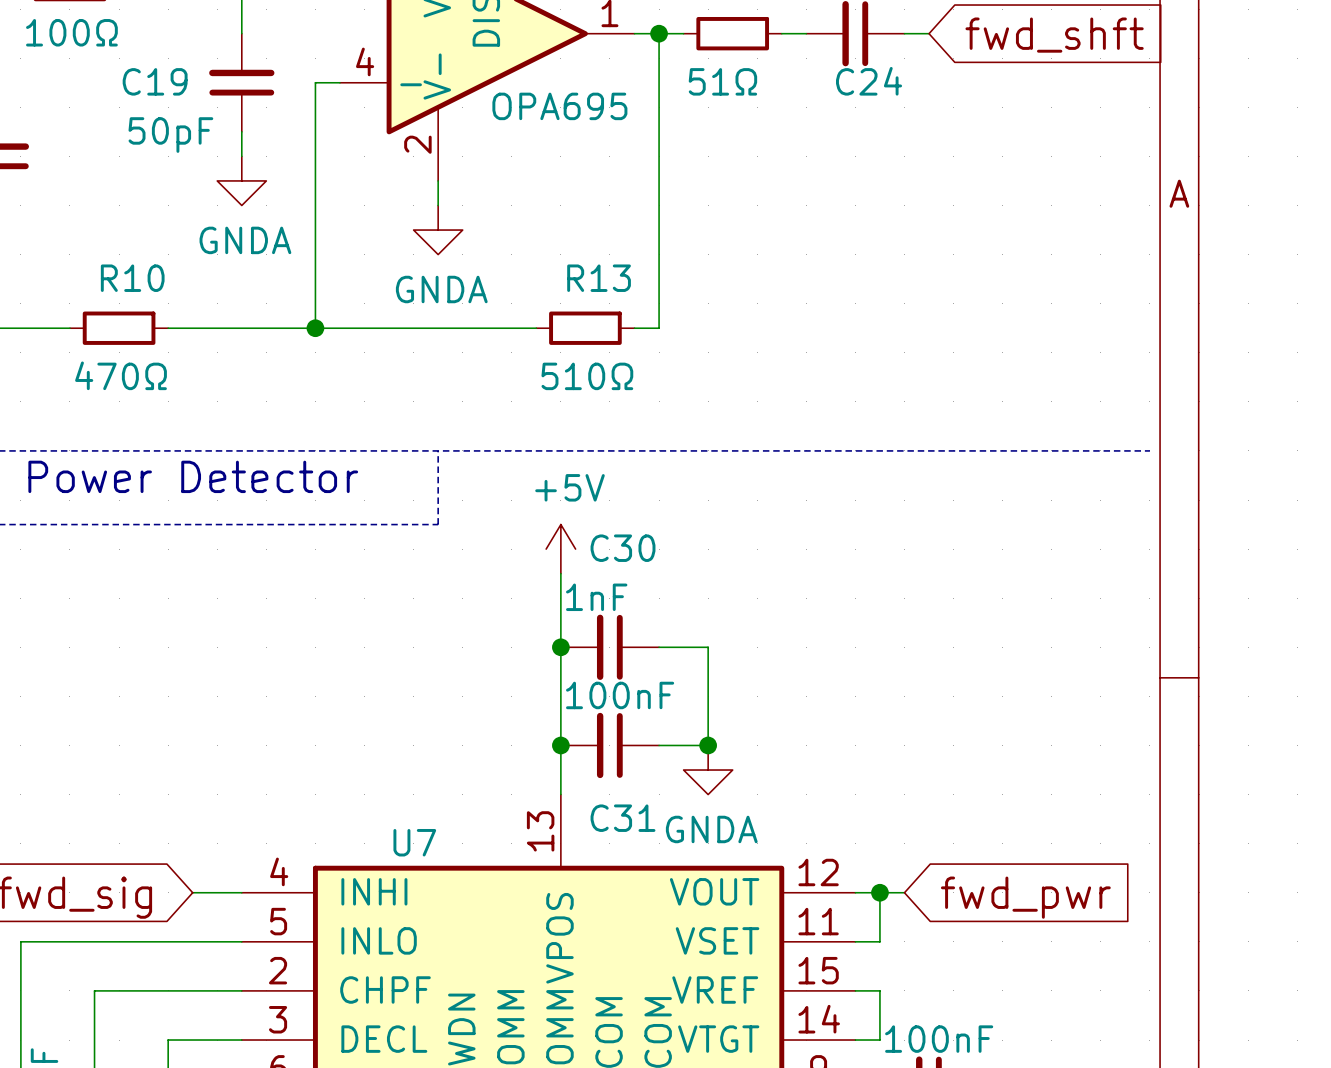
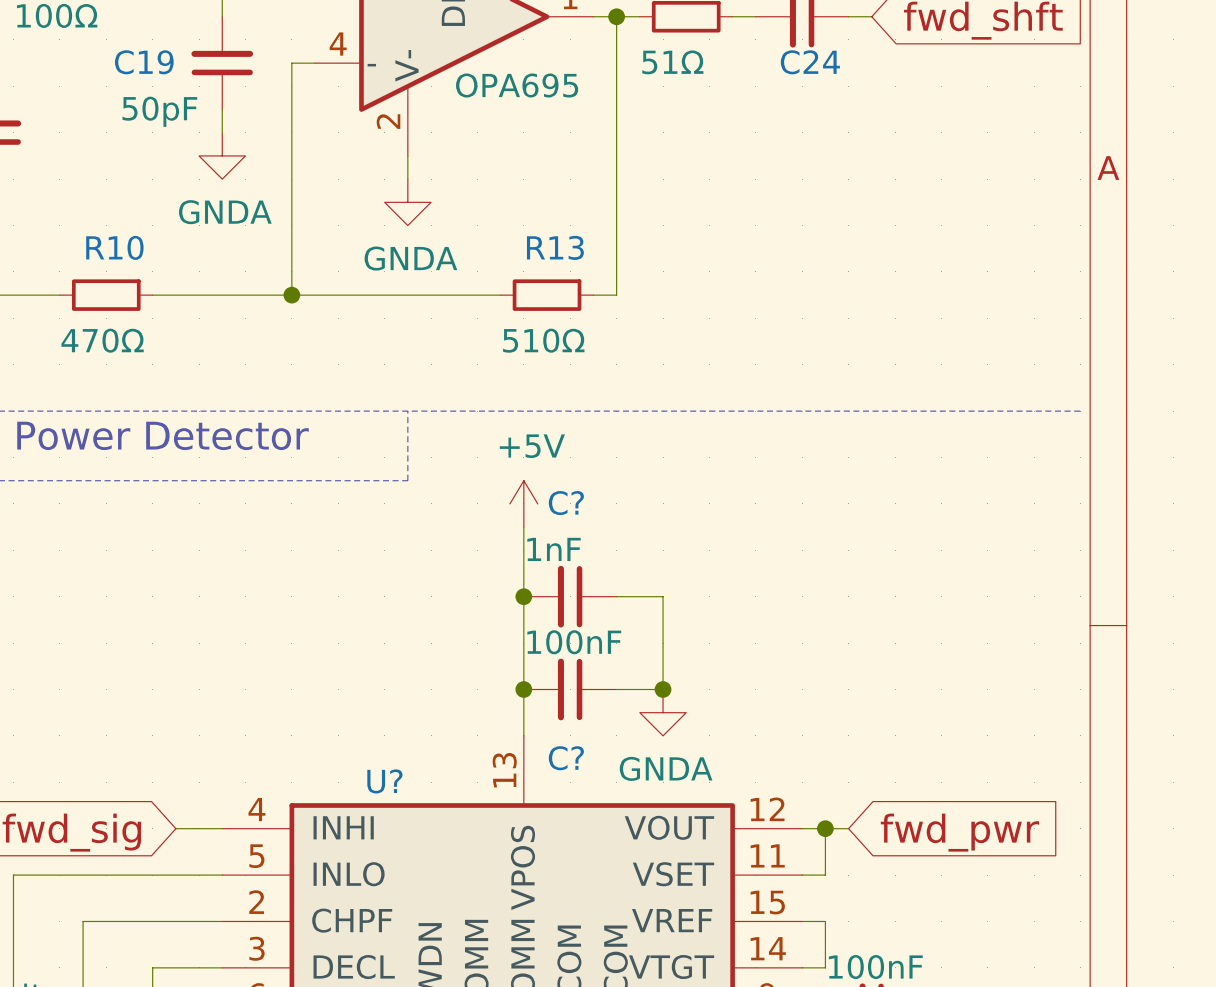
C30 name: C30 (623, 548) -> C? (566, 503)
C31 name: C31 (623, 818) -> C? (566, 758)
U7 name: U7 (414, 842) -> U? (384, 781)

